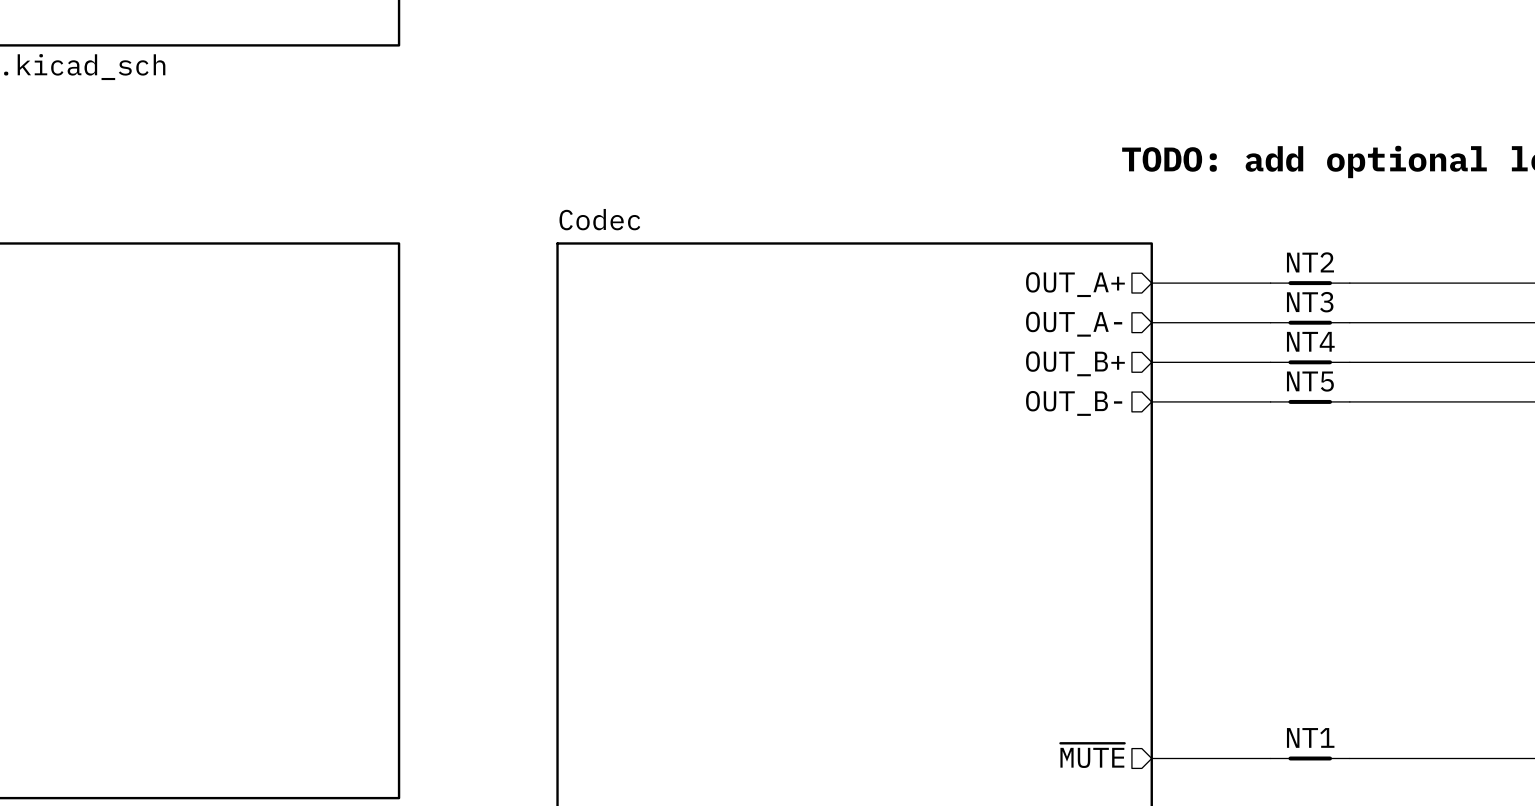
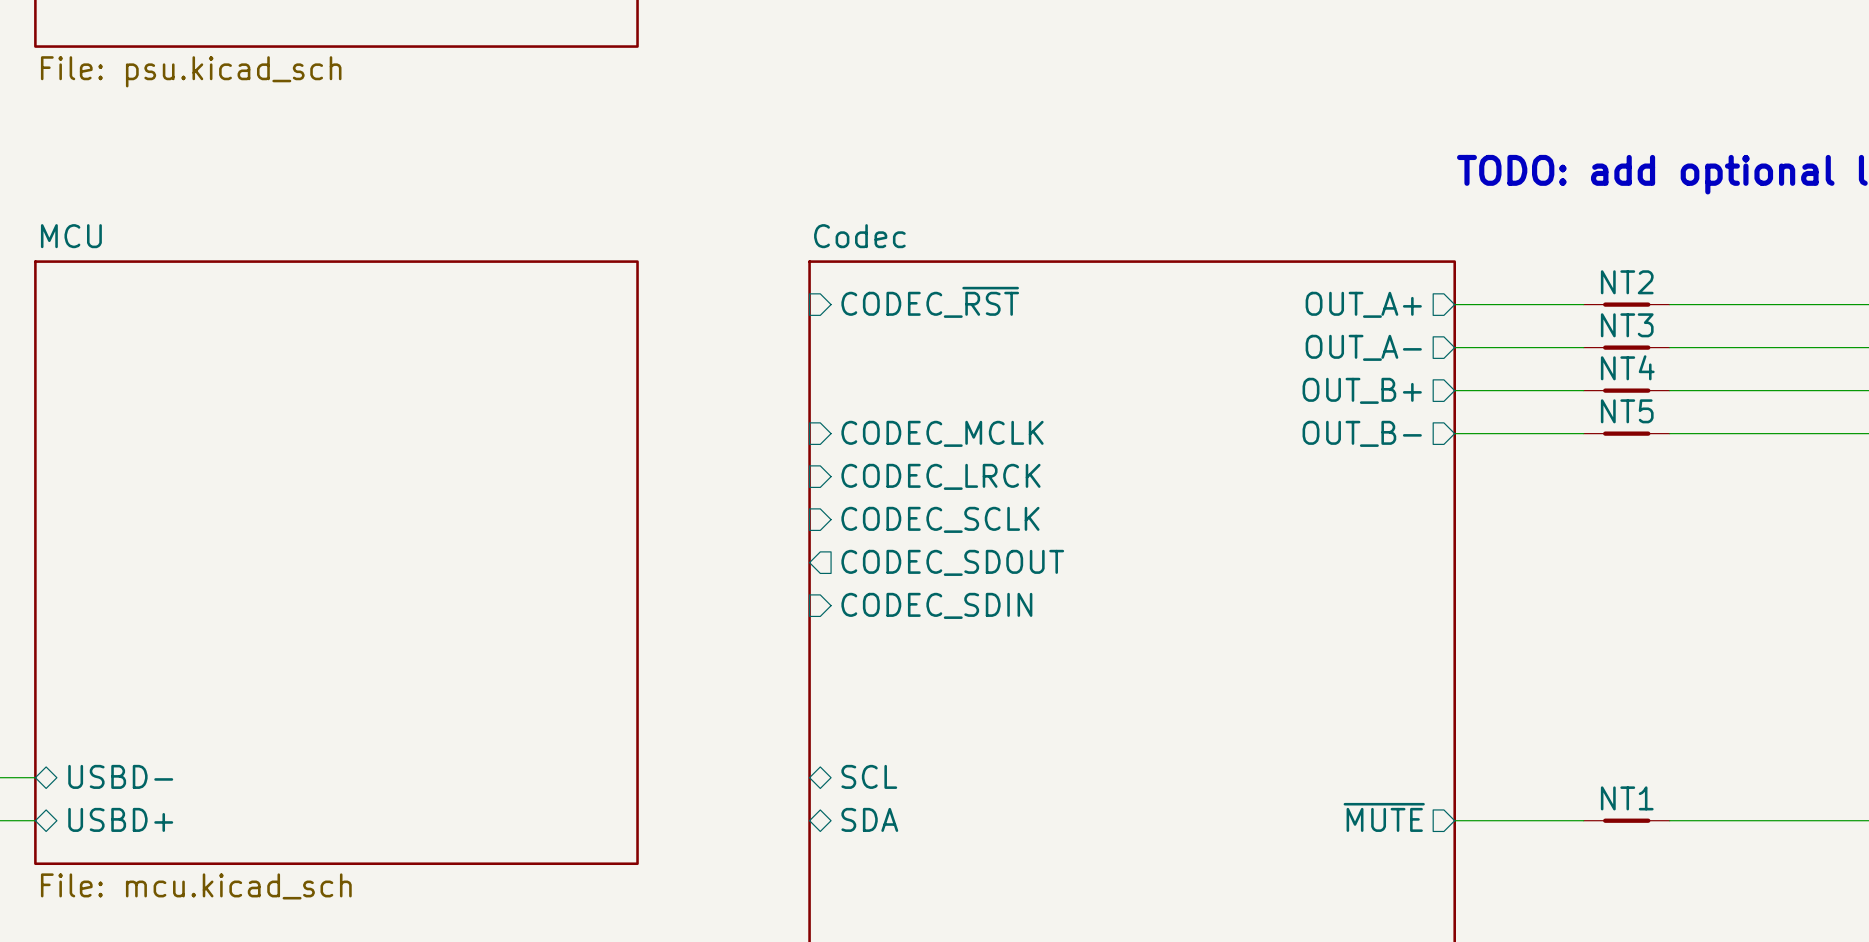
sheet pin: none -> CODEC_~{RST} (930, 302)
sheet pin: none -> CODEC_MCLK (942, 433)
sheet pin: none -> CODEC_LRCK (940, 476)
sheet pin: none -> CODEC_SCLK (940, 519)
sheet pin: none -> CODEC_SDOUT (952, 562)
sheet pin: none -> CODEC_SDIN (936, 605)
sheet pin: none -> SCL (869, 776)
sheet pin: none -> SDA (869, 819)

